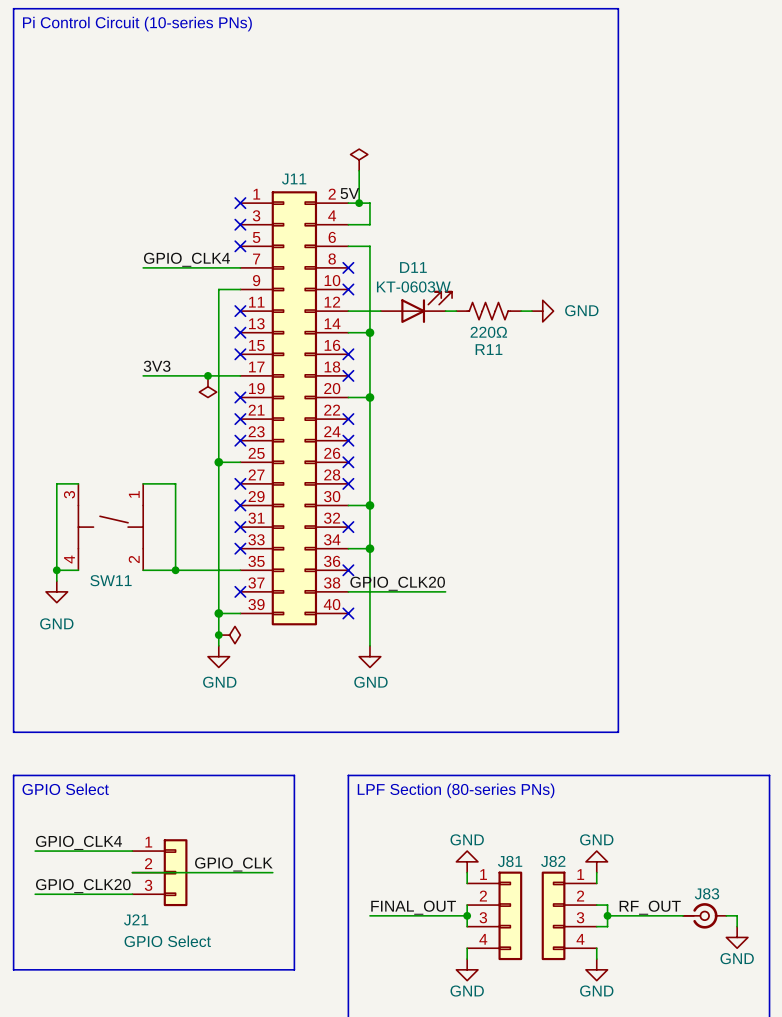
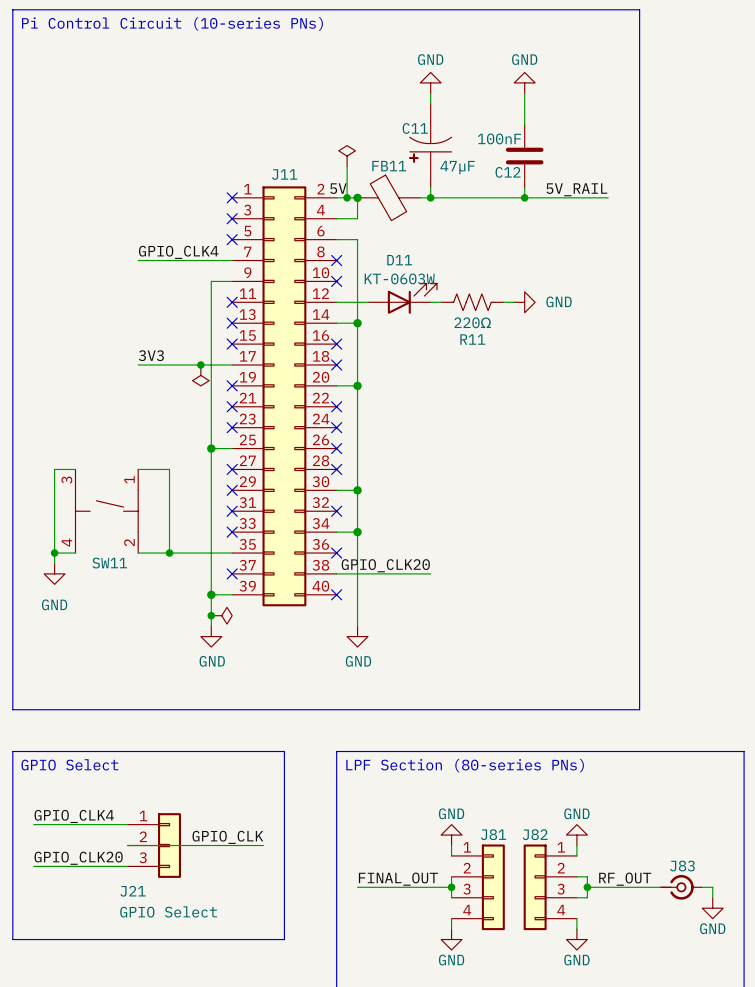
line: (618, 8) (618, 732) -> (597, 9) (639, 9) (639, 709) (597, 709)
power symbol: none -> GND (430, 82)
power symbol: none -> GND (524, 82)
wire: none -> (430, 93) (430, 103)
wire: none -> (524, 93) (524, 124)
C11: none -> 47µF (430, 145)
C12: none -> 100nF (524, 156)
wire: none -> (430, 187) (430, 197)
wire: none -> (524, 187) (524, 197)
label: none -> 5V_RAIL (576, 189)
junction: none -> (357, 197)
FB11: none -> (388, 197)
wire: none -> (420, 197) (608, 197)
junction: none -> (430, 197)
junction: none -> (524, 197)

